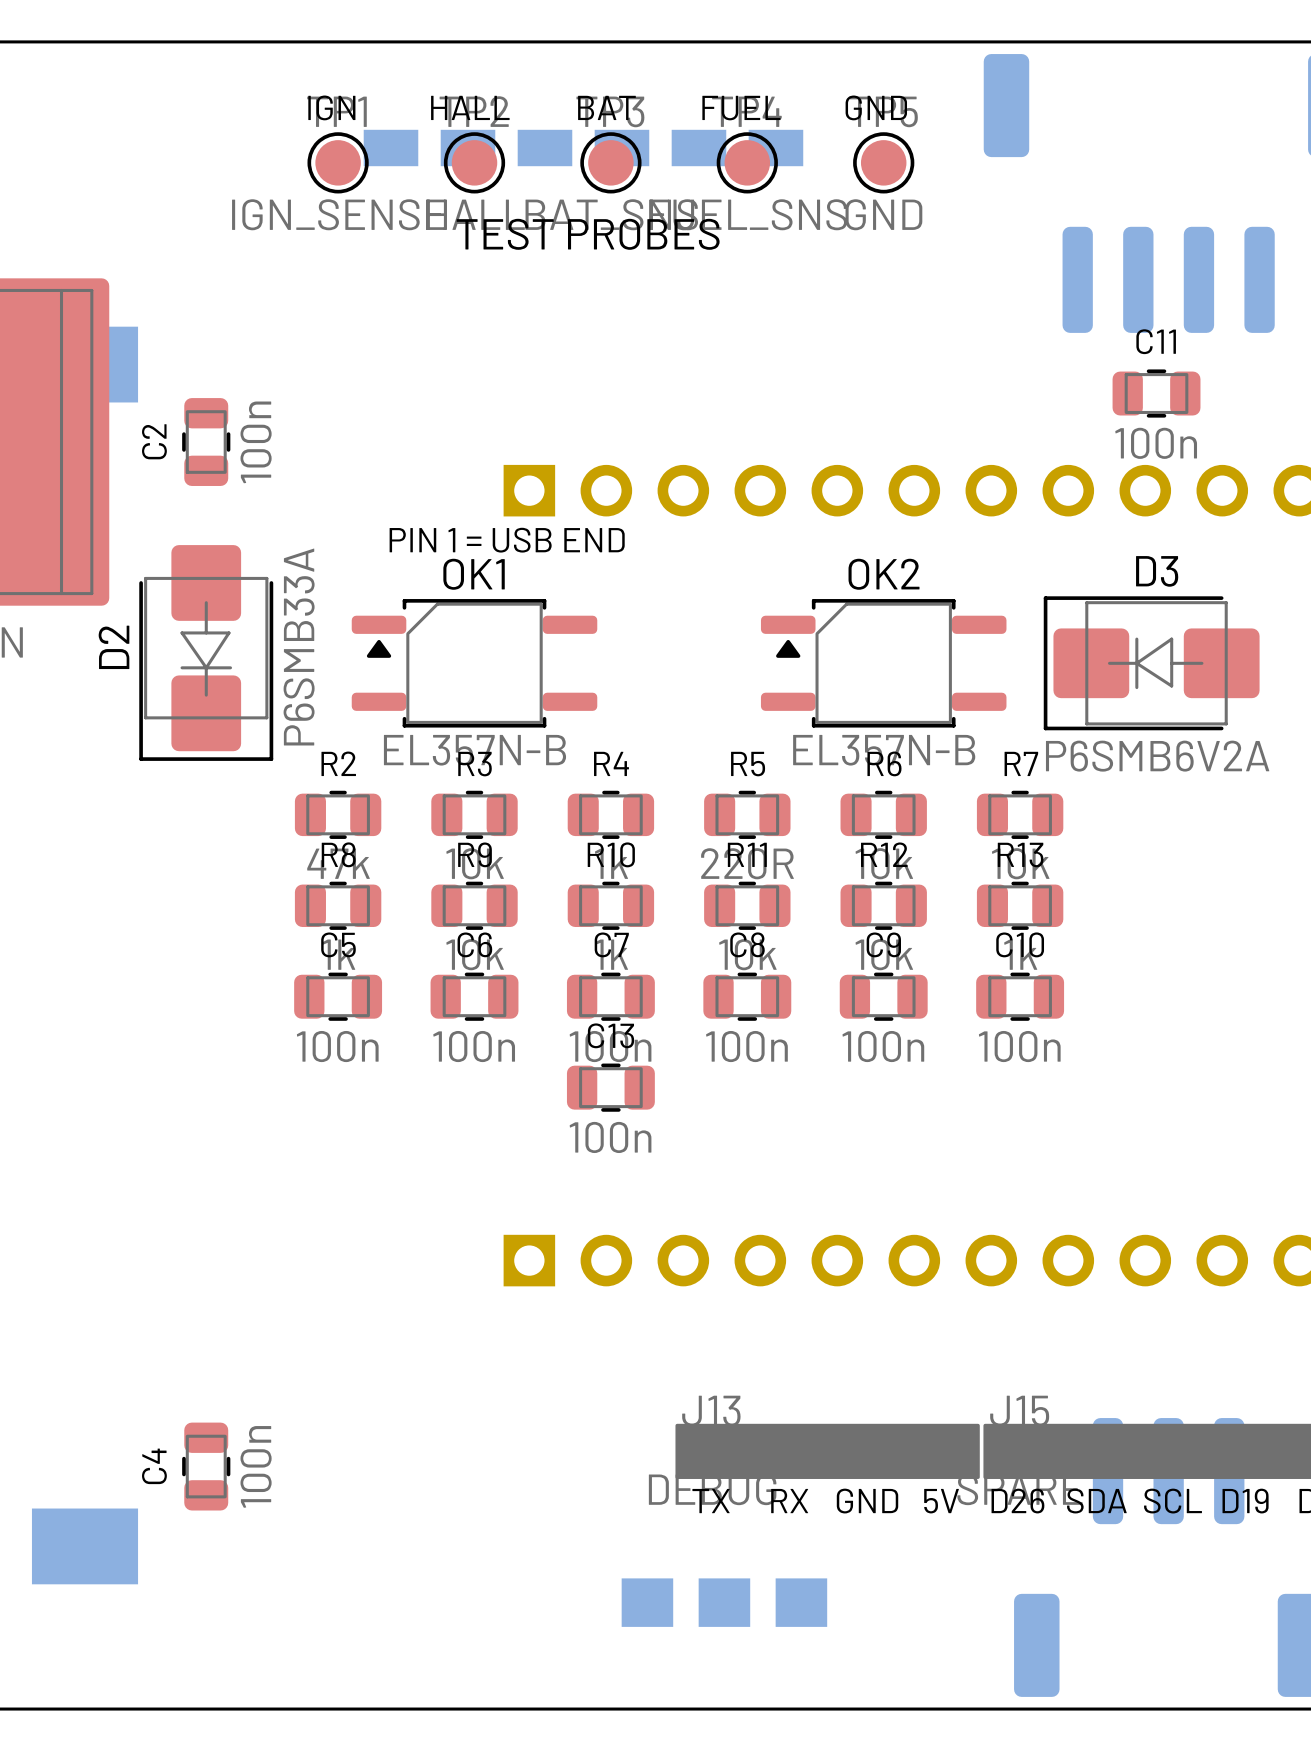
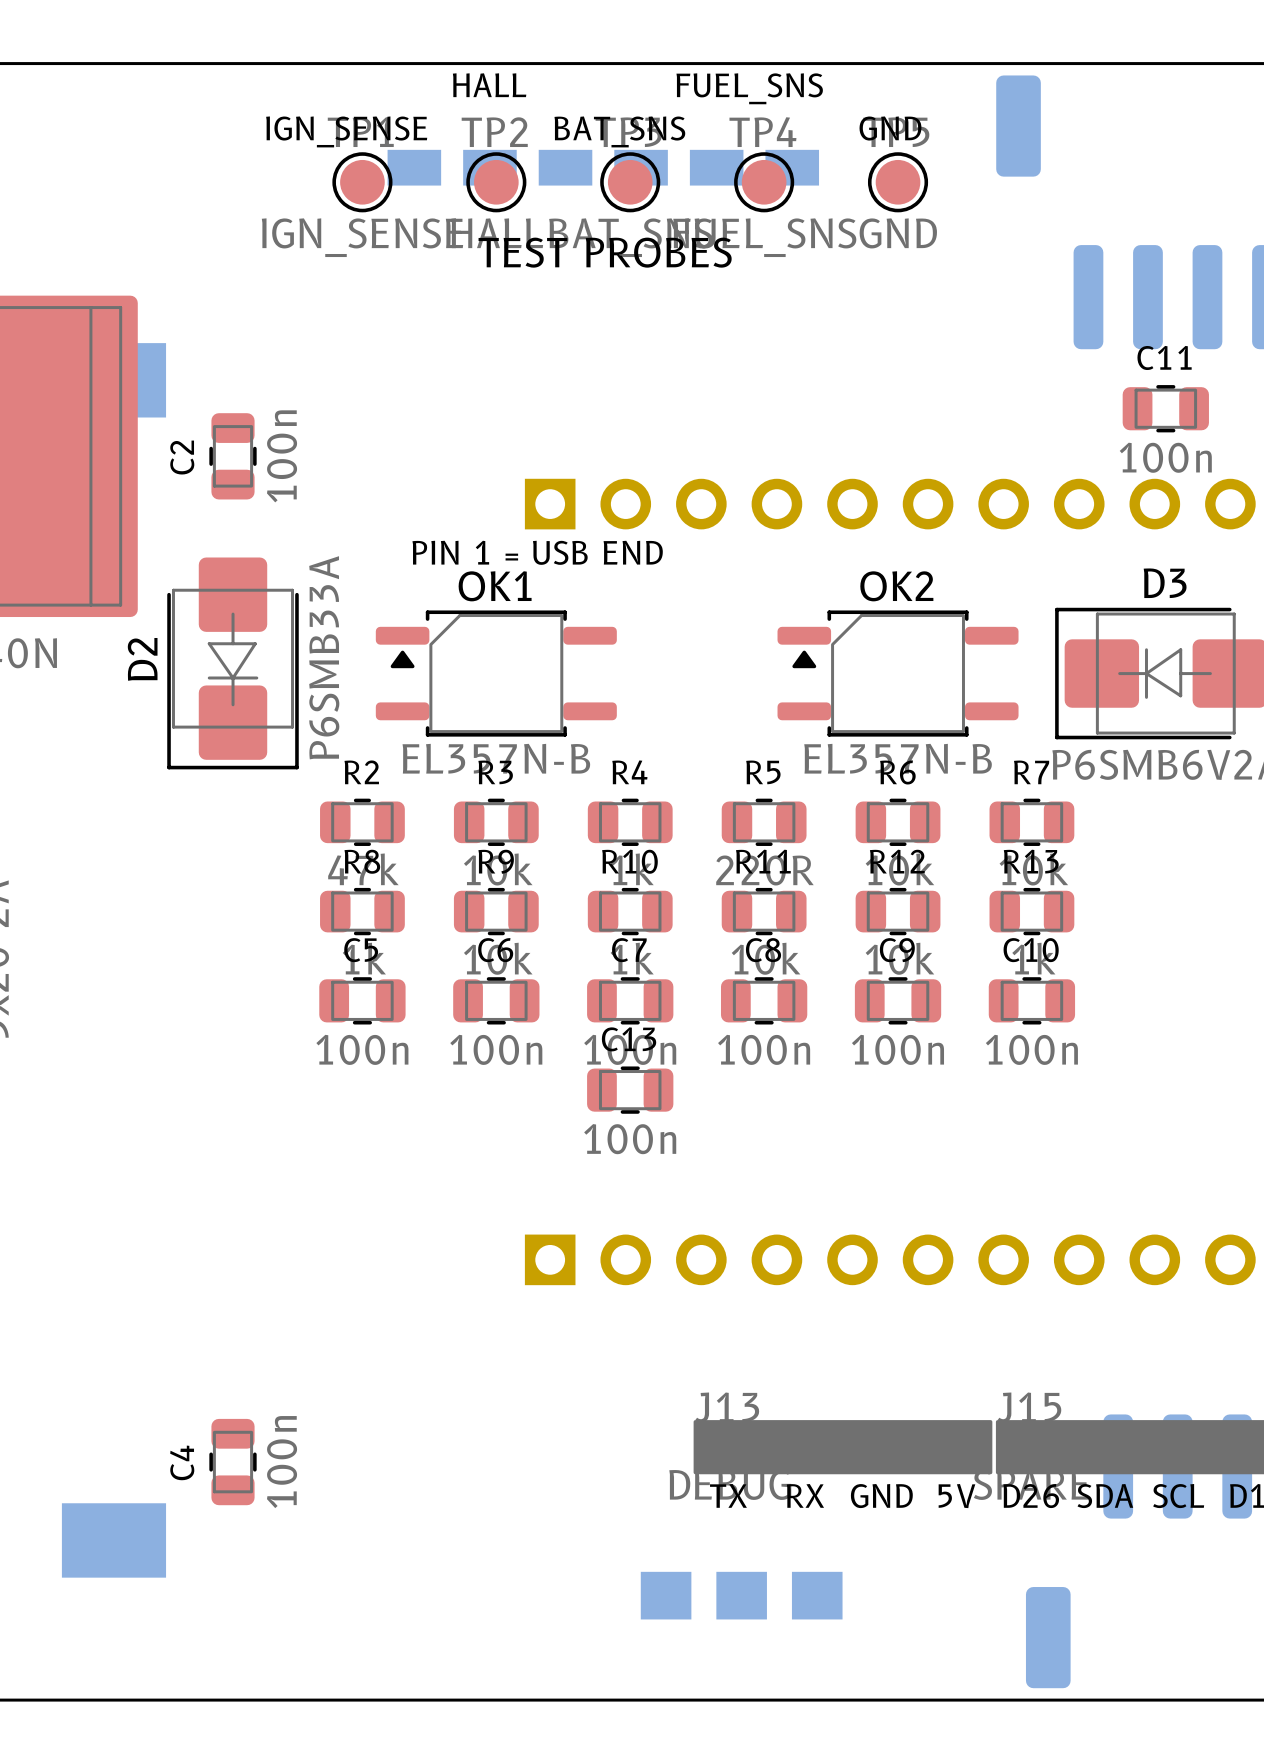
text: none -> IGN_SENSE (346, 131)
text: IGN (331, 107) -> none
text position: HALL (470, 107) -> HALL (489, 85)
text: none -> BAT_SNS (619, 131)
text: BAT (606, 107) -> none
text: FUEL (741, 108) -> FUEL_SNS (749, 88)

